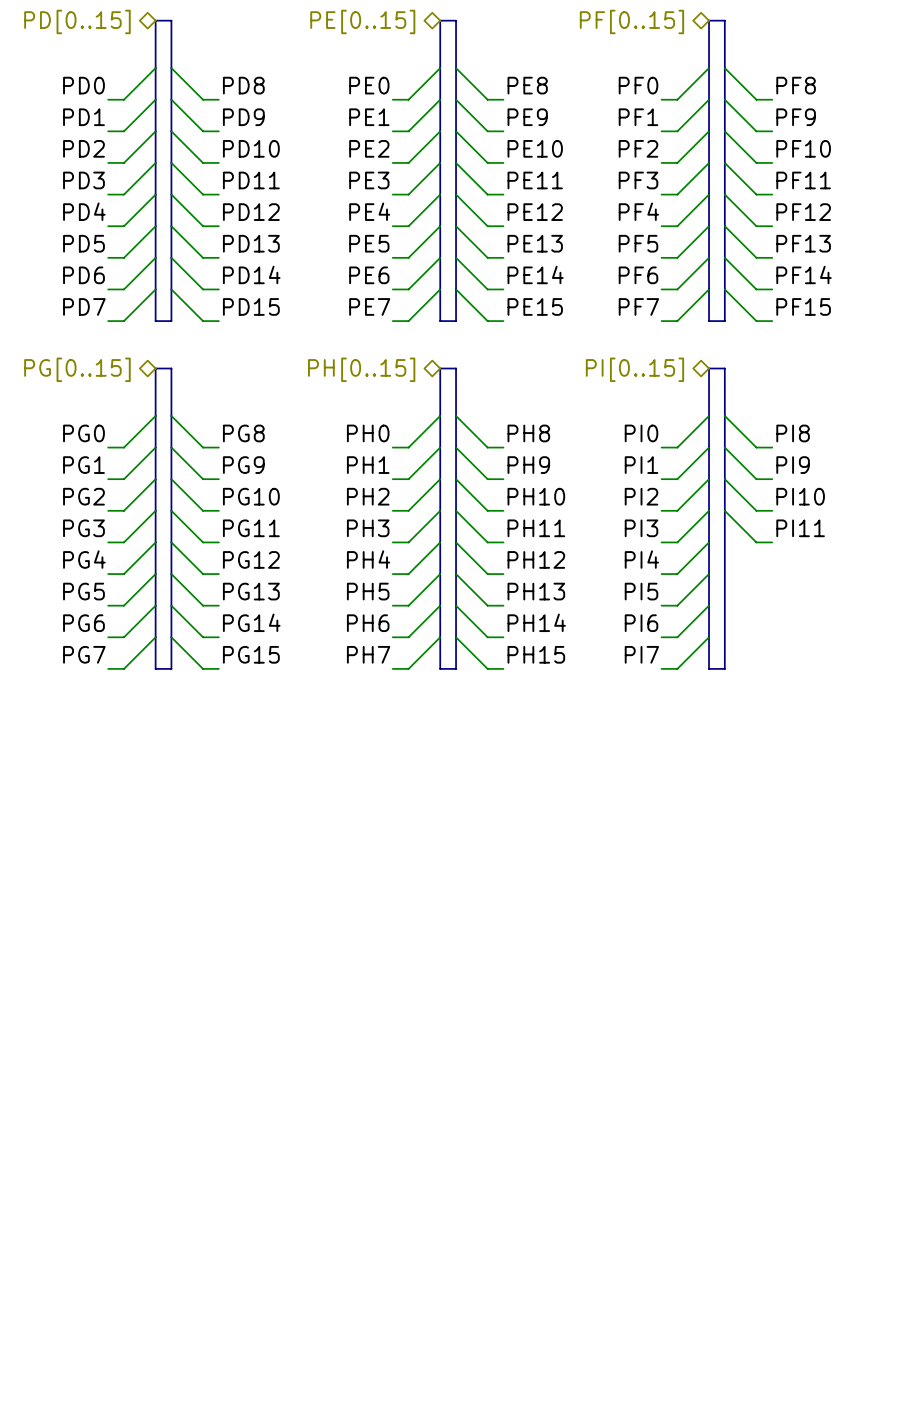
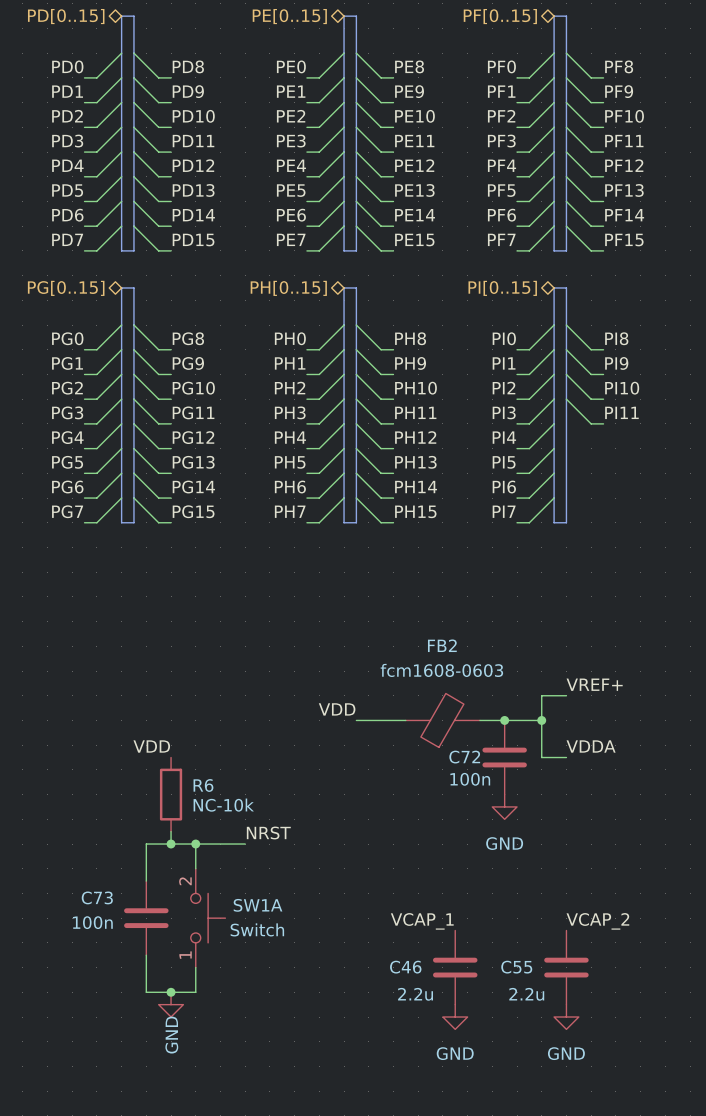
label: none -> VREF+ (594, 684)
wire: none -> (566, 695) (541, 695) (541, 757) (566, 757)
label: none -> VDD (337, 709)
wire: none -> (356, 720) (405, 720)
FB2: none -> fcm1608-0603 (442, 720)
wire: none -> (479, 720) (541, 720)
junction: none -> (504, 720)
junction: none -> (541, 720)
label: none -> VDD (151, 746)
label: none -> VDDA (591, 746)
C72: none -> 100n (504, 757)
R6: none -> NC-10k (171, 794)
power symbol: none -> GND (504, 806)
wire: none -> (171, 831) (171, 844)
label: none -> NRST (268, 833)
junction: none -> (171, 844)
wire: none -> (195, 844) (195, 868)
junction: none -> (195, 844)
wire: none -> (245, 844) (146, 844) (146, 881)
C73: none -> 100n (146, 918)
SW1A: none -> Switch (208, 918)
label: none -> VCAP_1 (422, 921)
label: none -> VCAP_2 (597, 921)
wire: none -> (146, 955) (146, 992) (195, 992) (195, 967)
C46: none -> 2.2u (455, 967)
C55: none -> 2.2u (566, 967)
junction: none -> (171, 992)
power symbol: none -> GND (171, 1004)
power symbol: none -> GND (455, 1017)
power symbol: none -> GND (566, 1017)

